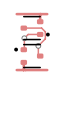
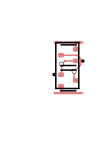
line: none -> (55, 42) (78, 42) (78, 88) (55, 88) (55, 42)

